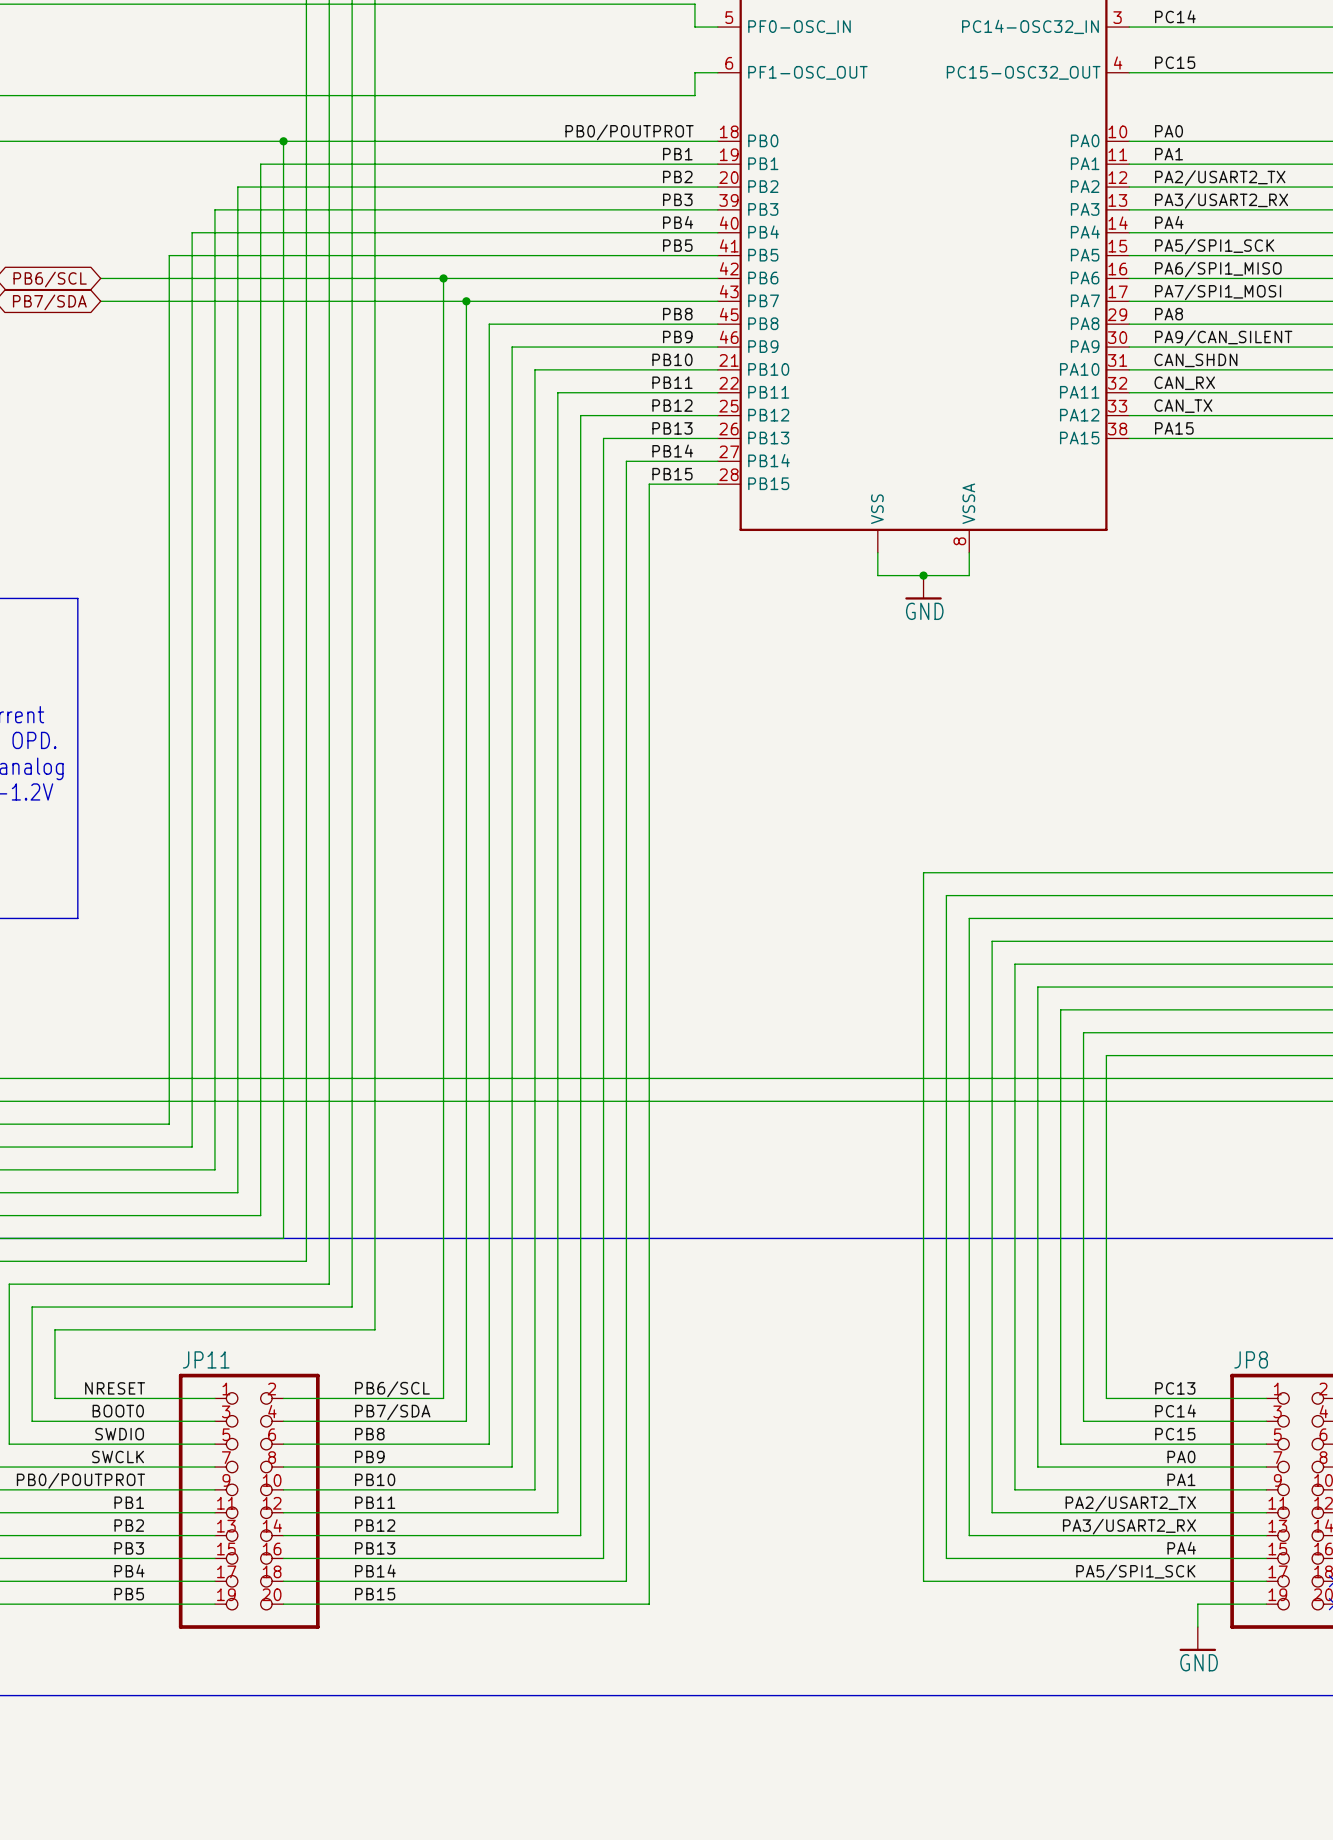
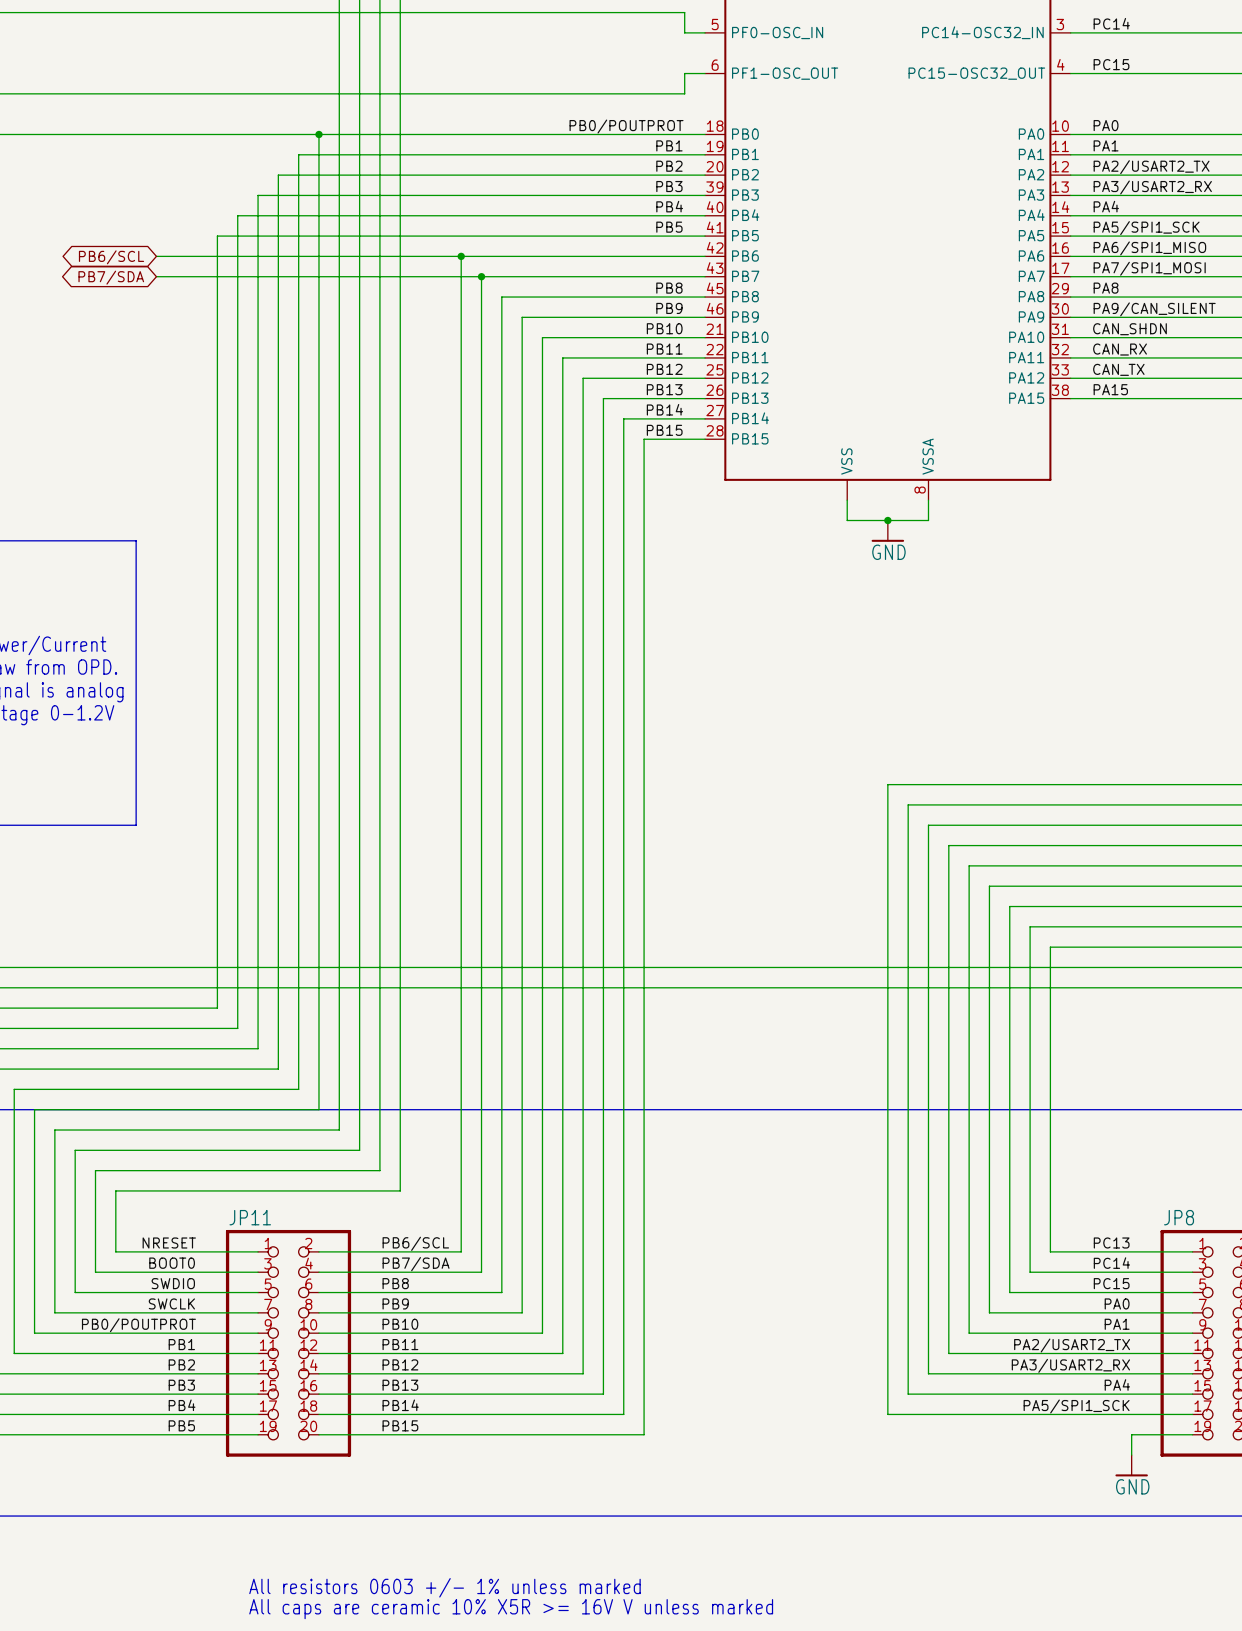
text: none -> All resistors 0603 +/- 1% unless marked (444, 1587)
text: none -> All caps are ceramic 10% X5R >= 16V V unless marked (511, 1609)

